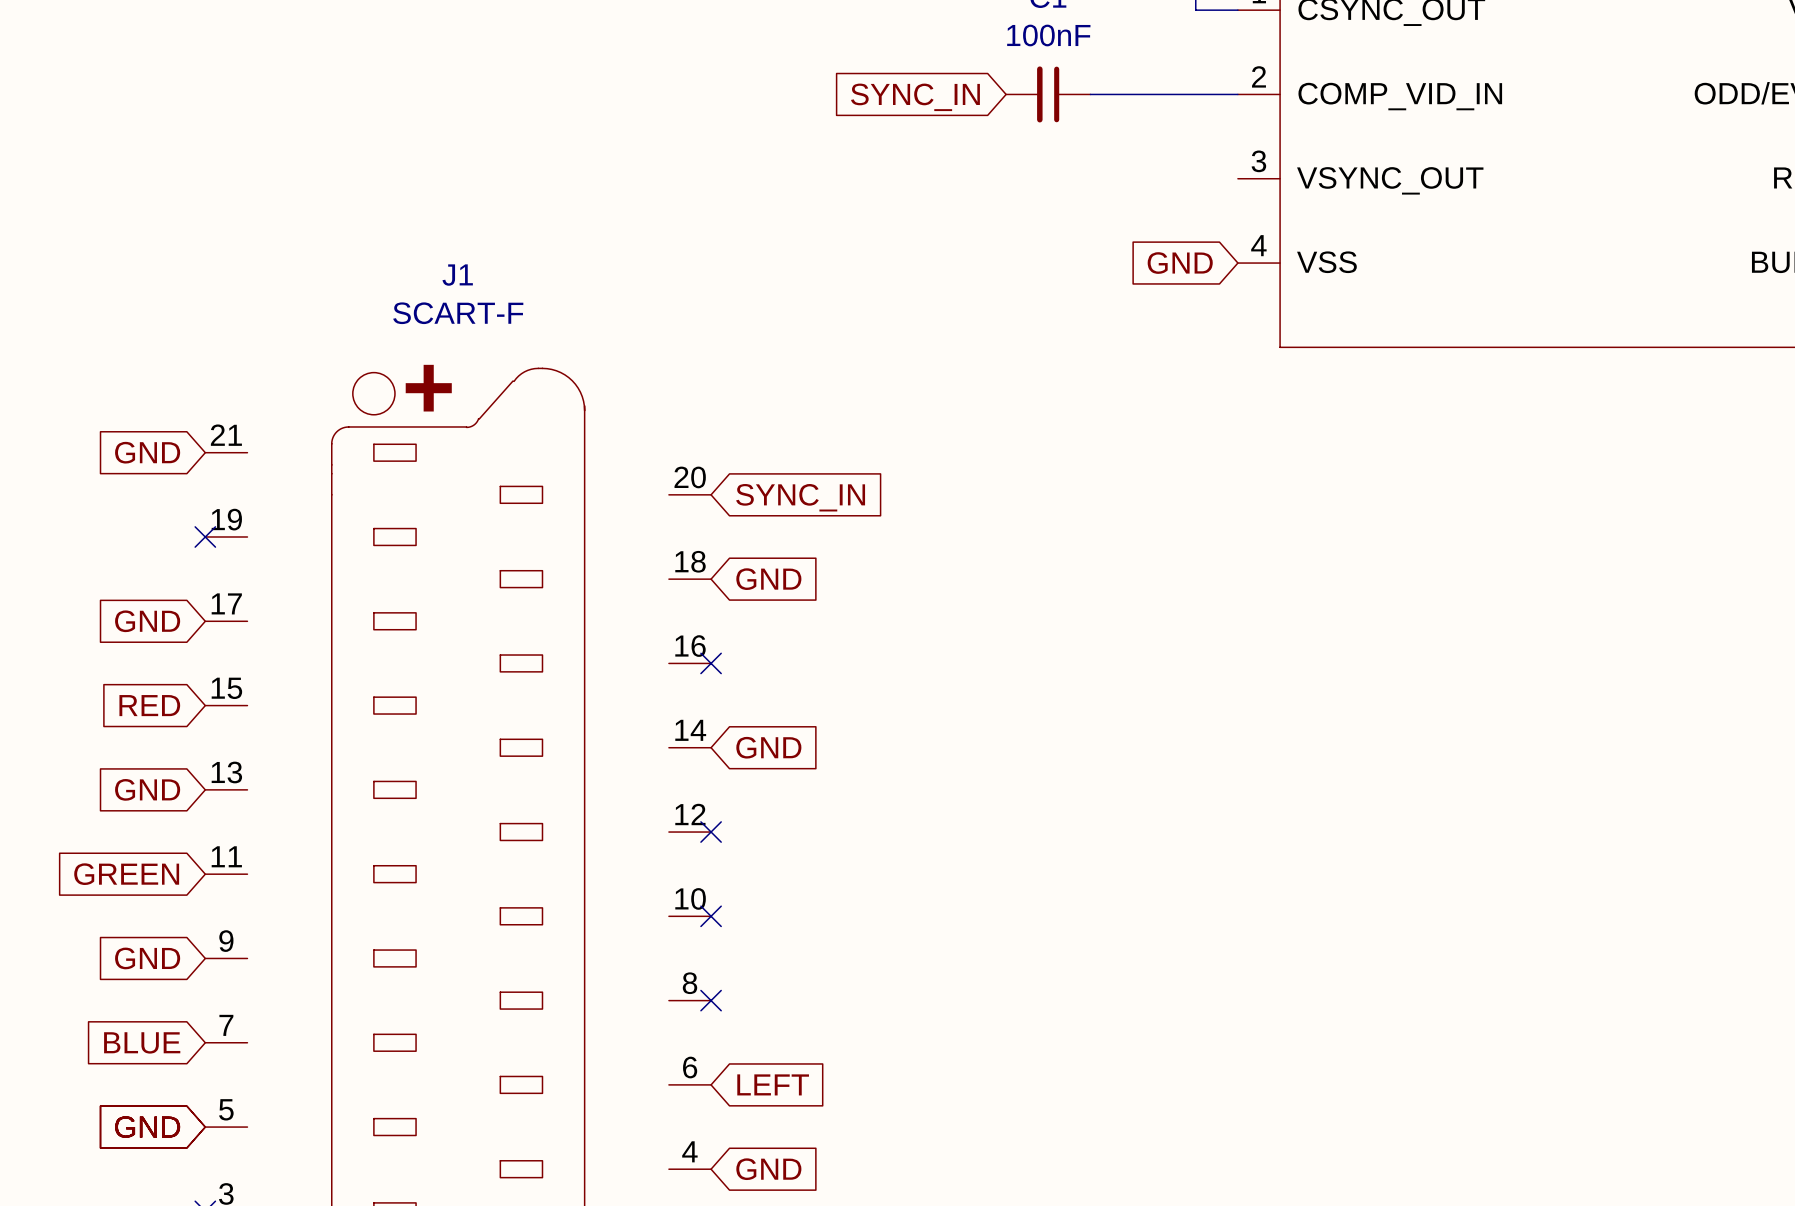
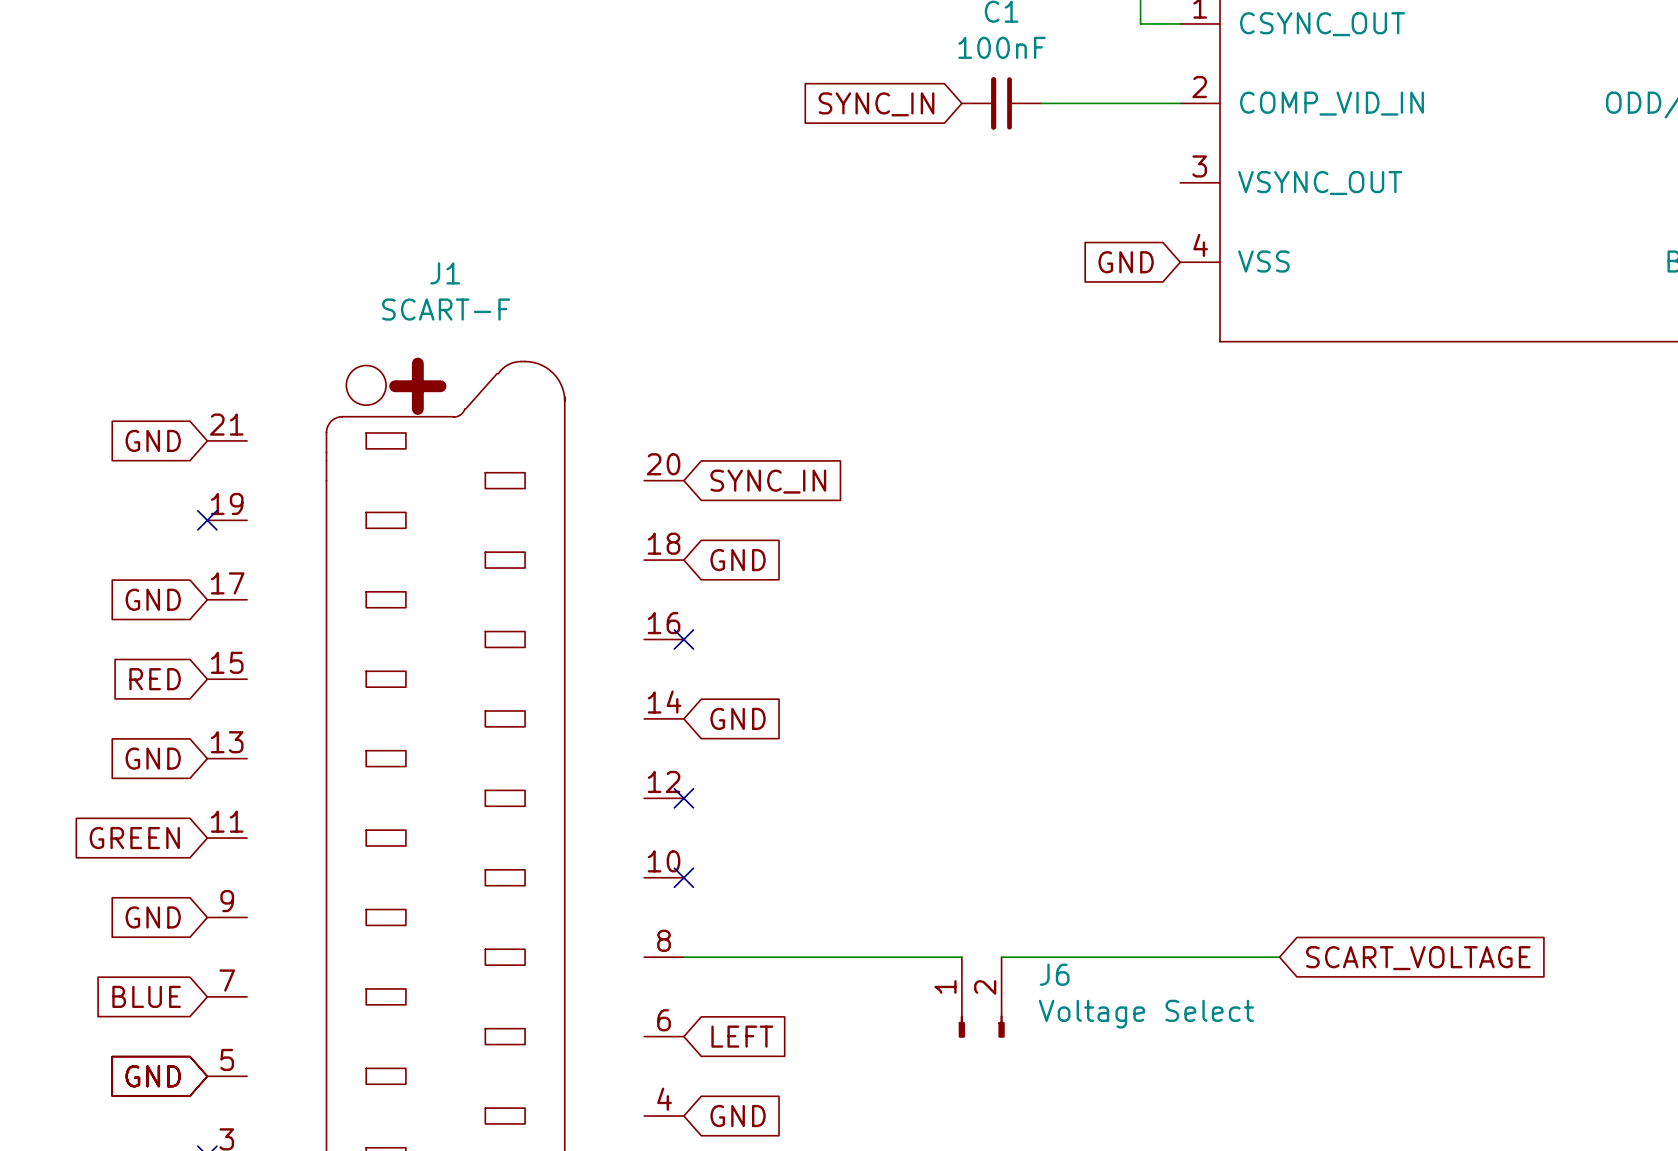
wire: none -> (683, 957) (961, 957)
no-connect mark: (711, 1000) -> none
wire: none -> (1001, 957) (1279, 957)
global label: none -> SCART_VOLTAGE (1418, 958)
J6: none -> Voltage Select (981, 997)

